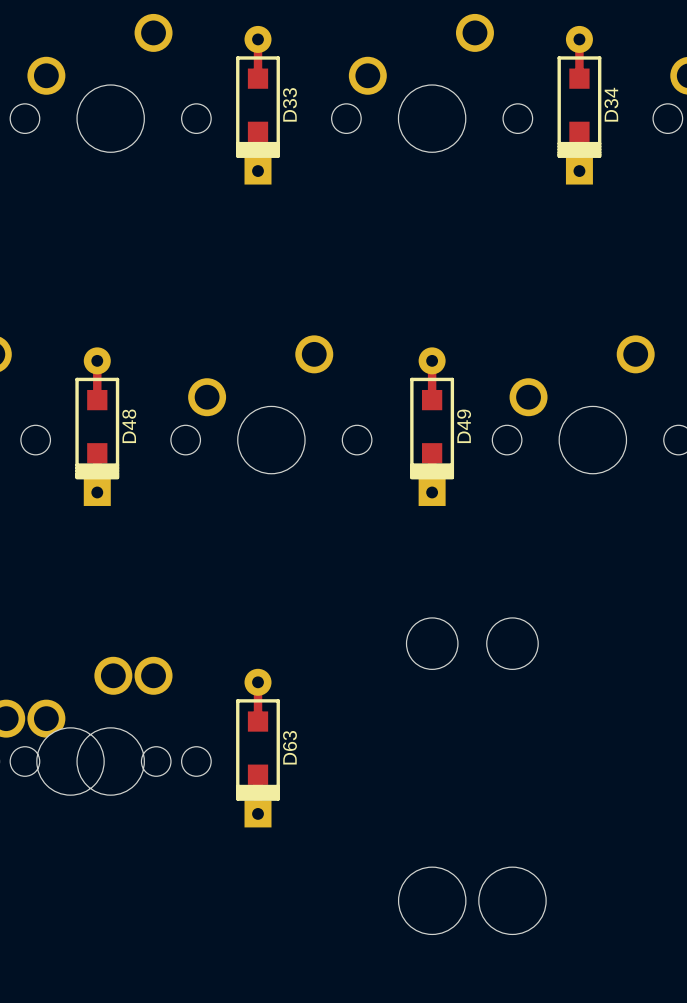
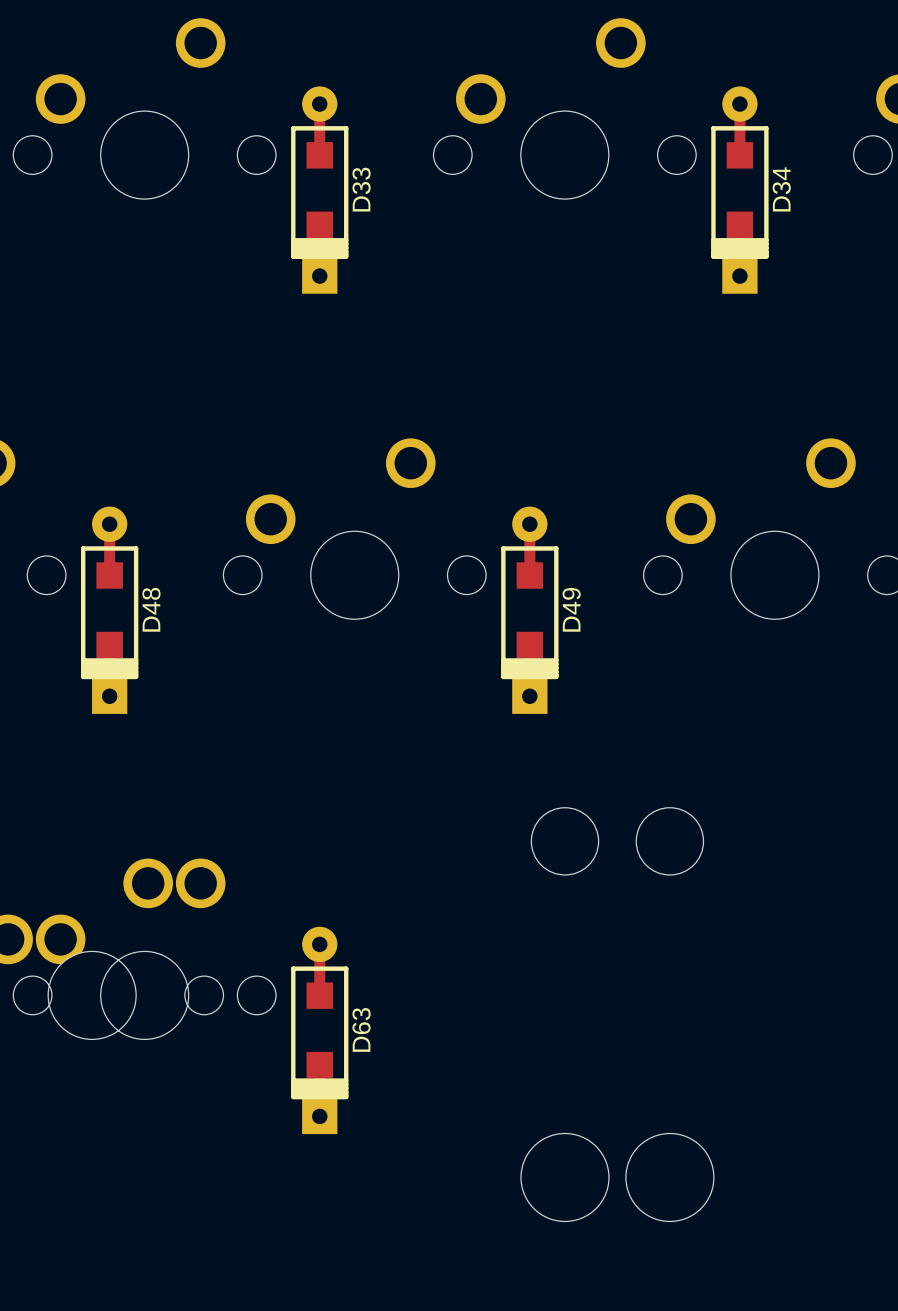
D33 position: (258, 105) -> (319, 190)
D34 position: (579, 105) -> (739, 190)
D48 position: (97, 426) -> (109, 610)
D49 position: (432, 426) -> (529, 610)
D63 position: (258, 748) -> (319, 1030)

